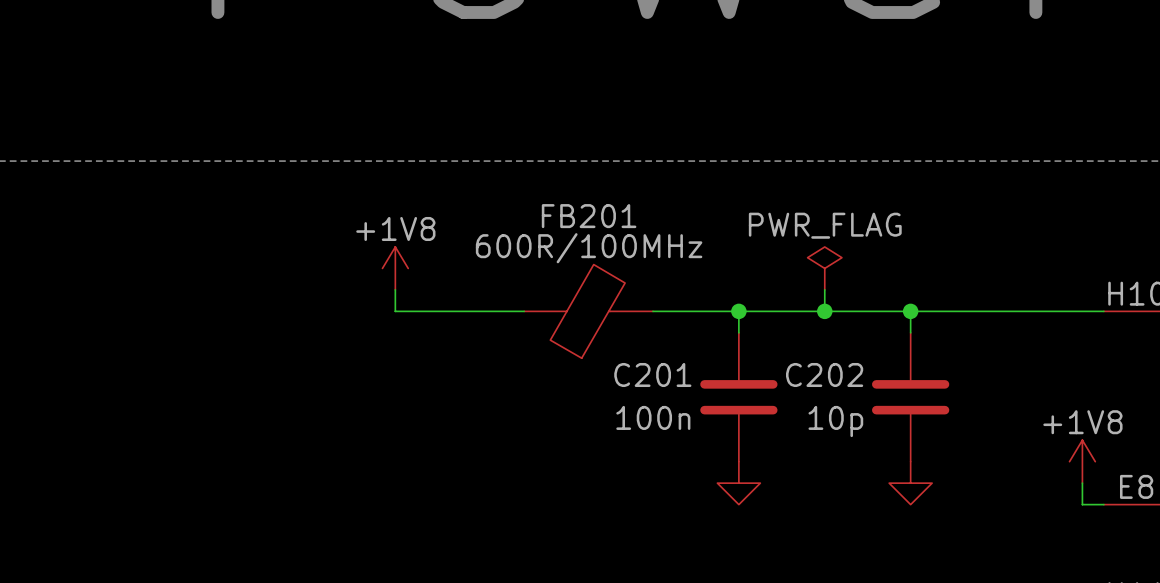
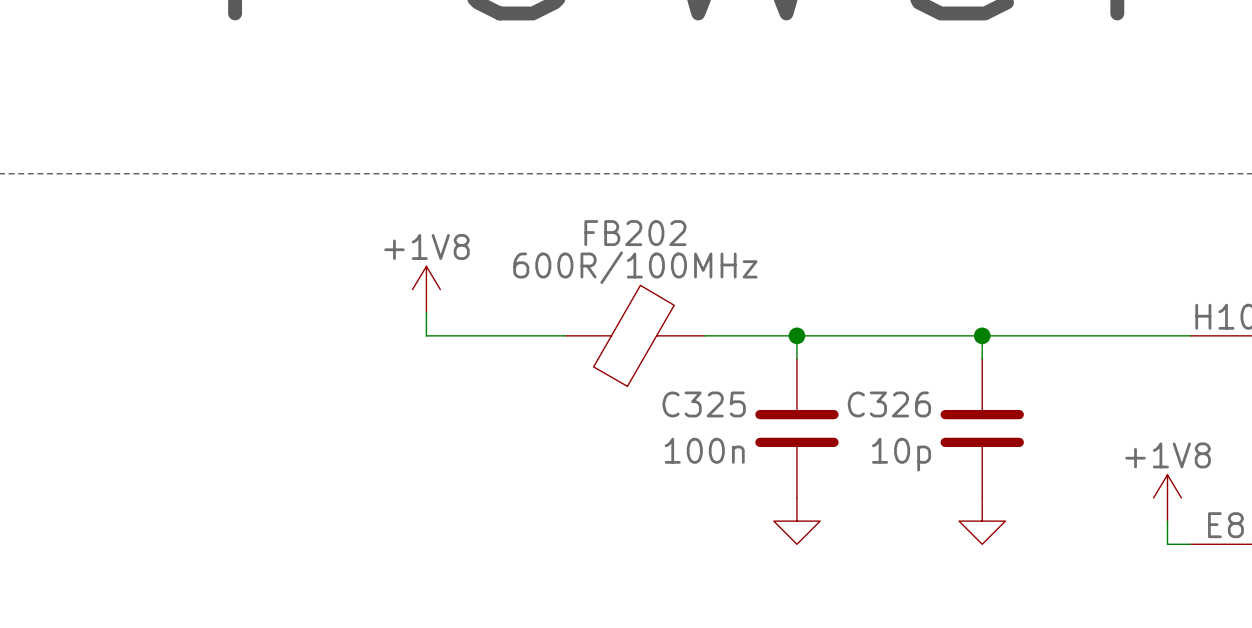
FB201 name: FB201 (589, 216) -> FB202 (635, 233)
power symbol: PWR_FLAG (824, 268) -> none
wire: (824, 289) (824, 311) -> none
junction: (824, 311) -> none
C201 name: C201 (652, 374) -> C325 (704, 404)
C202 name: C202 (824, 374) -> C326 (889, 404)

